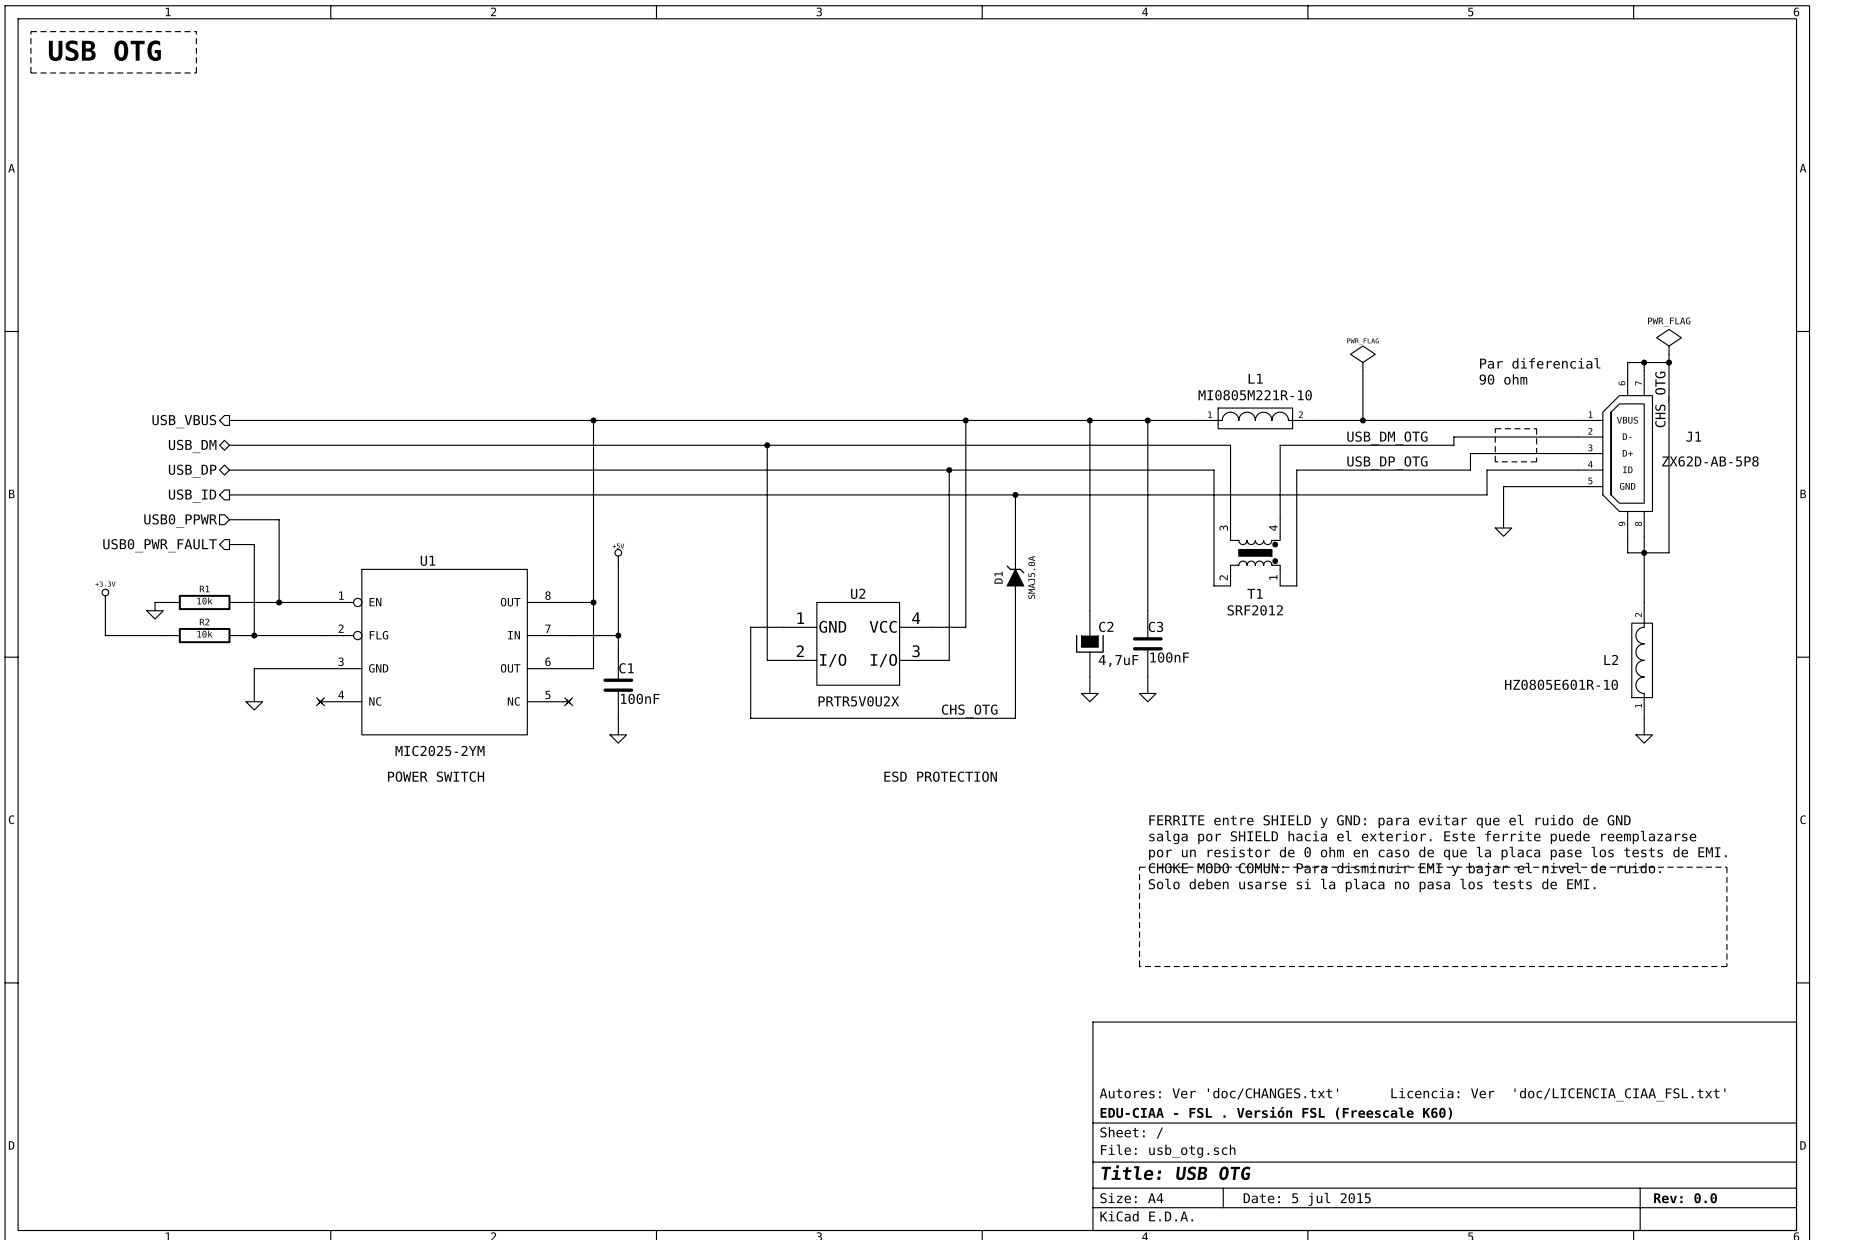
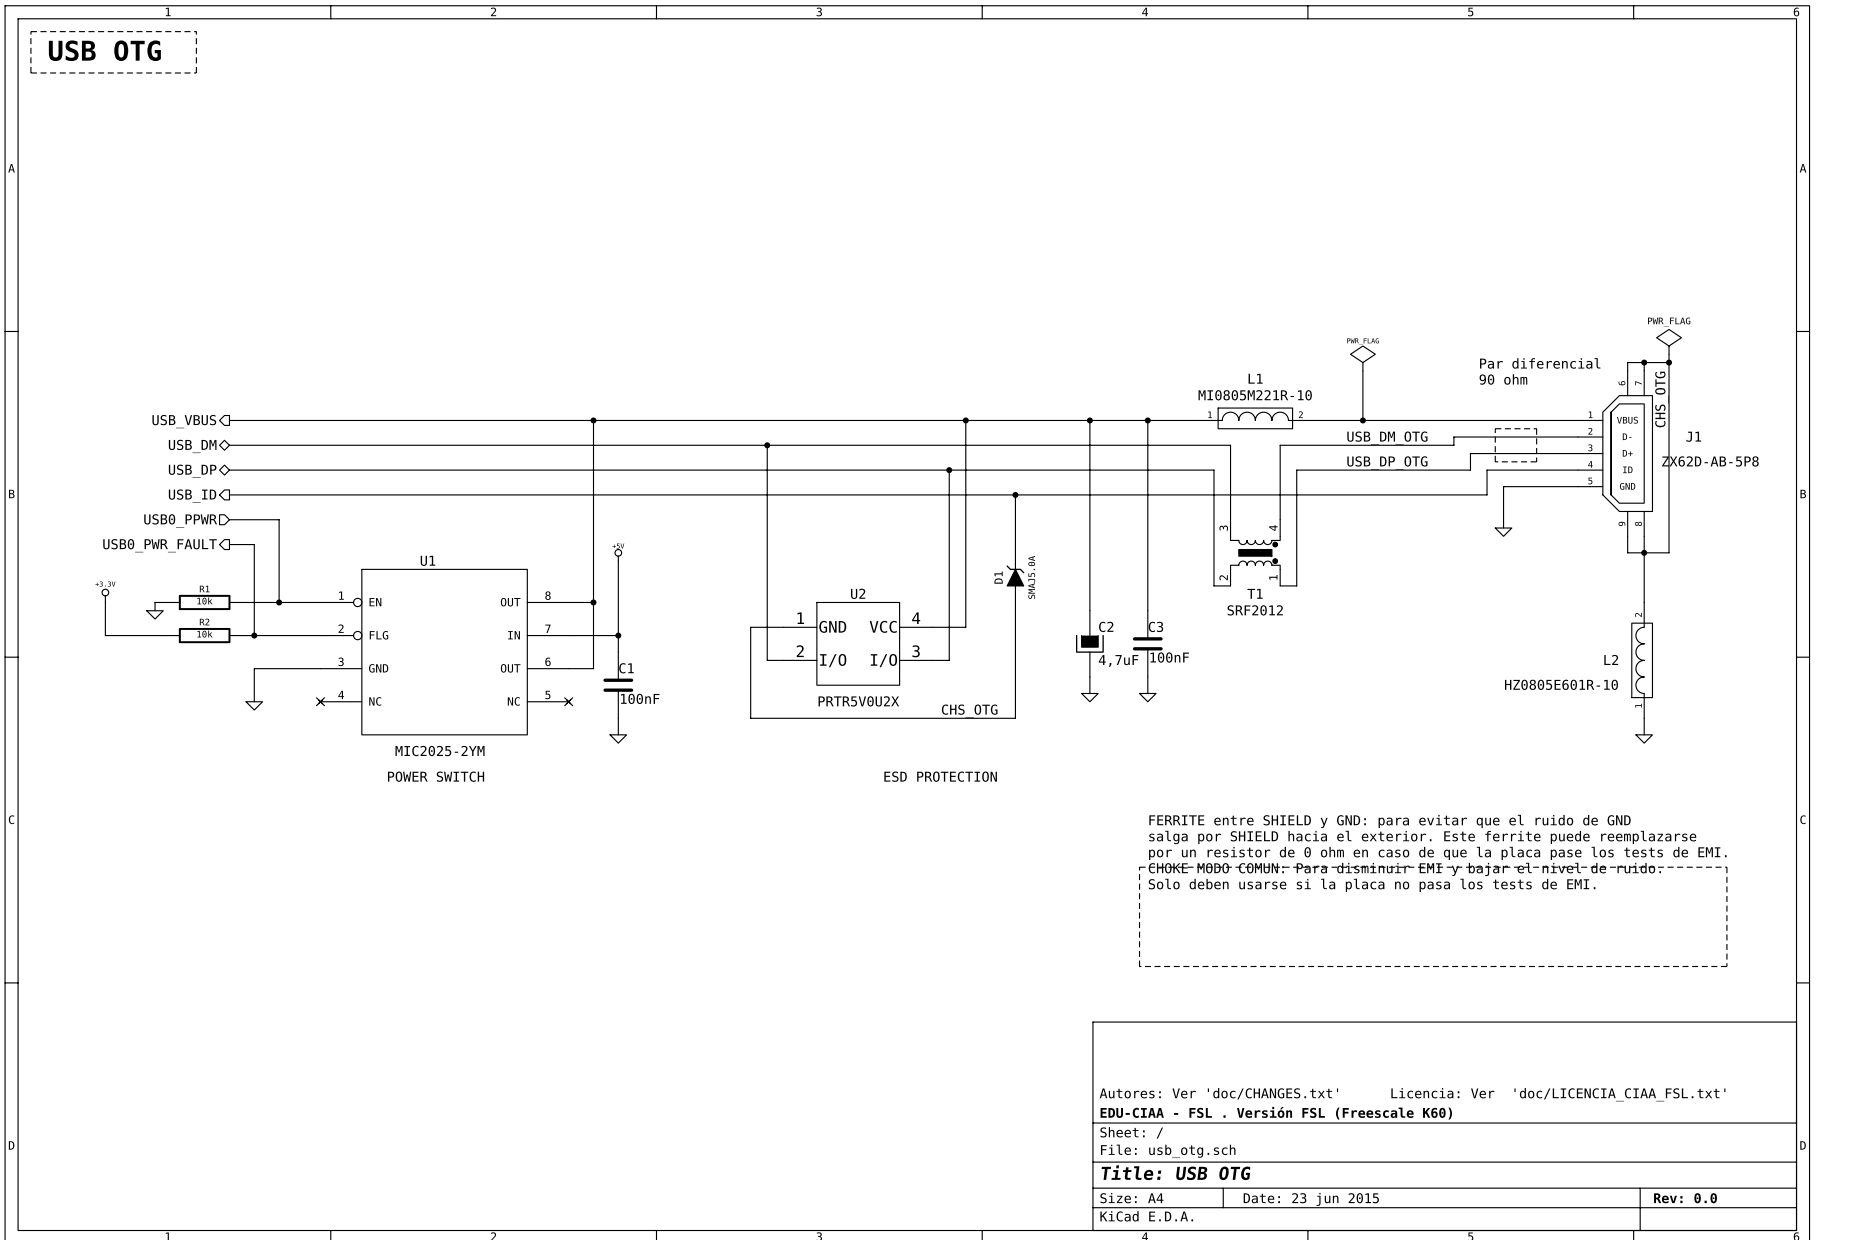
title block: Date: 5 jul 2015 (1307, 1199) -> Date: 23 jun 2015 (1311, 1199)

